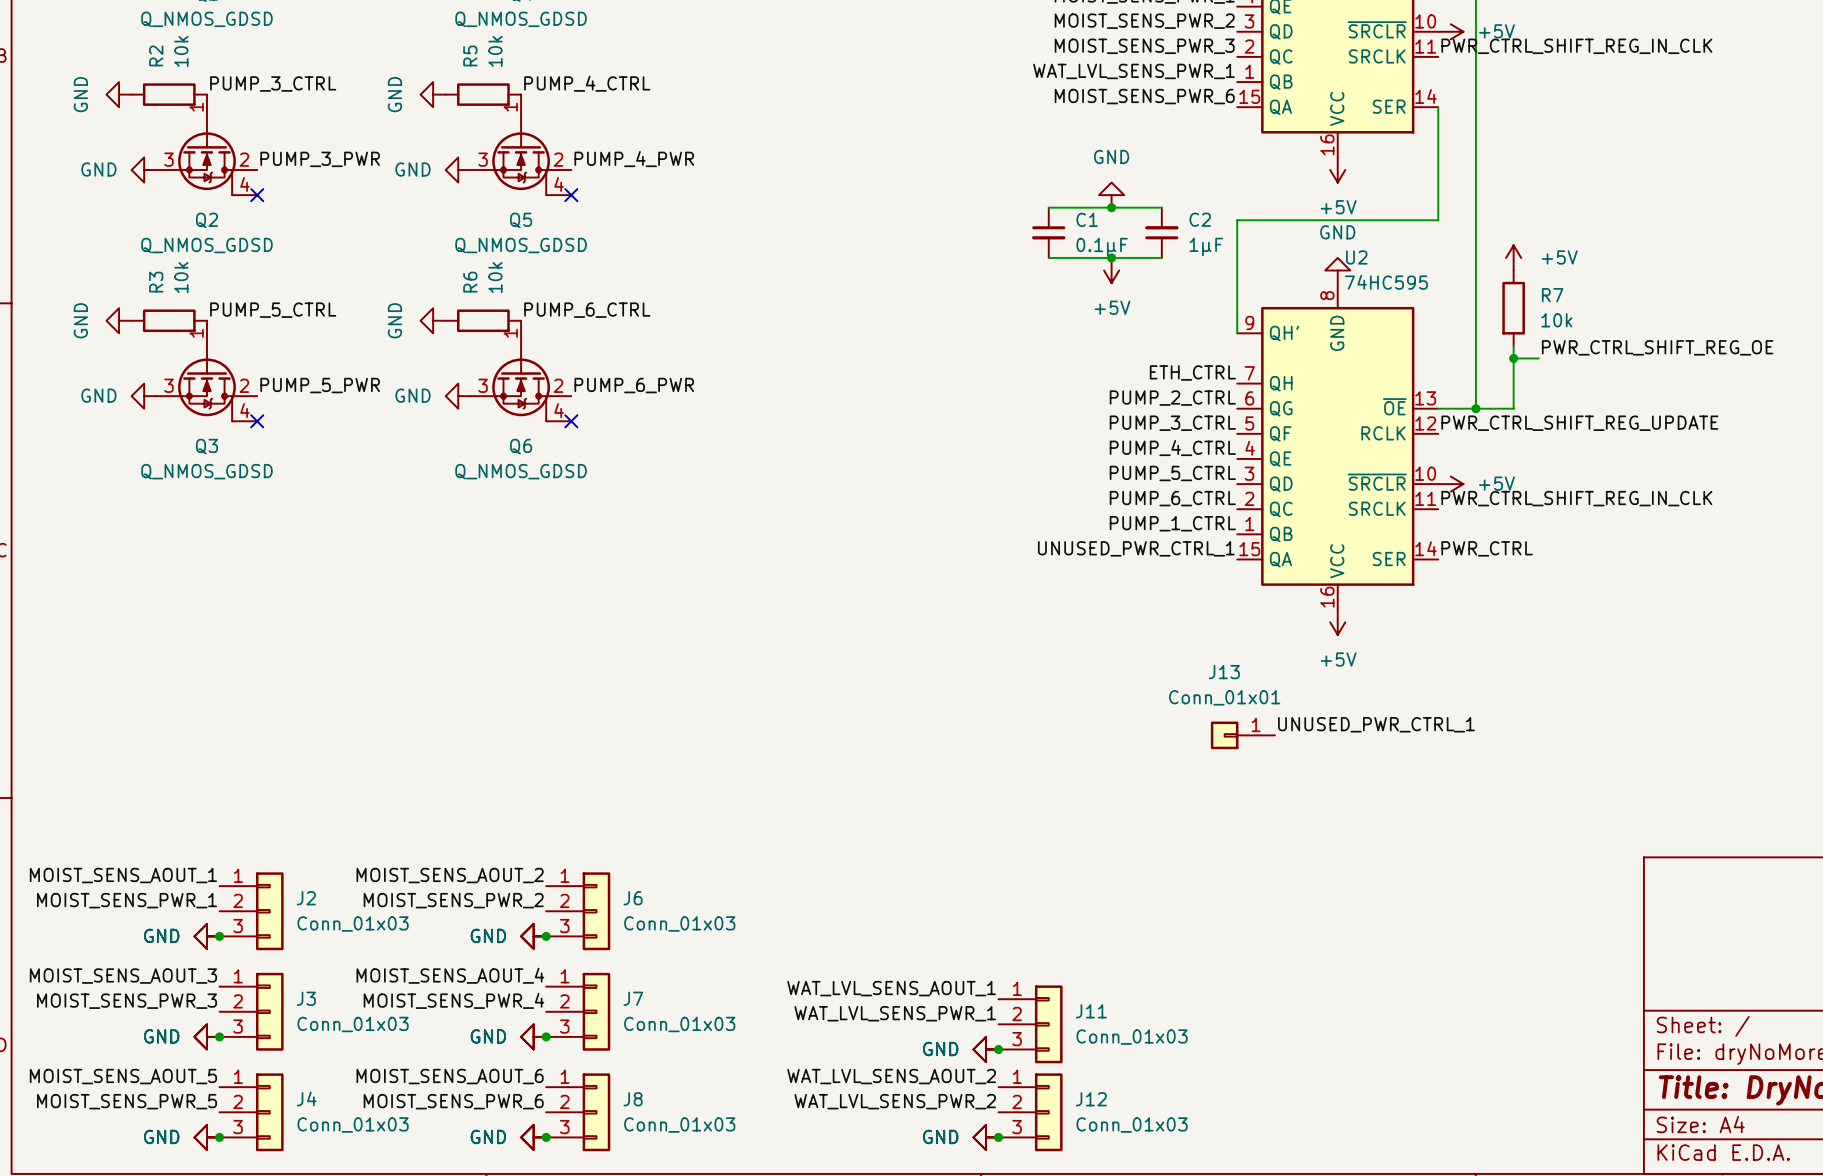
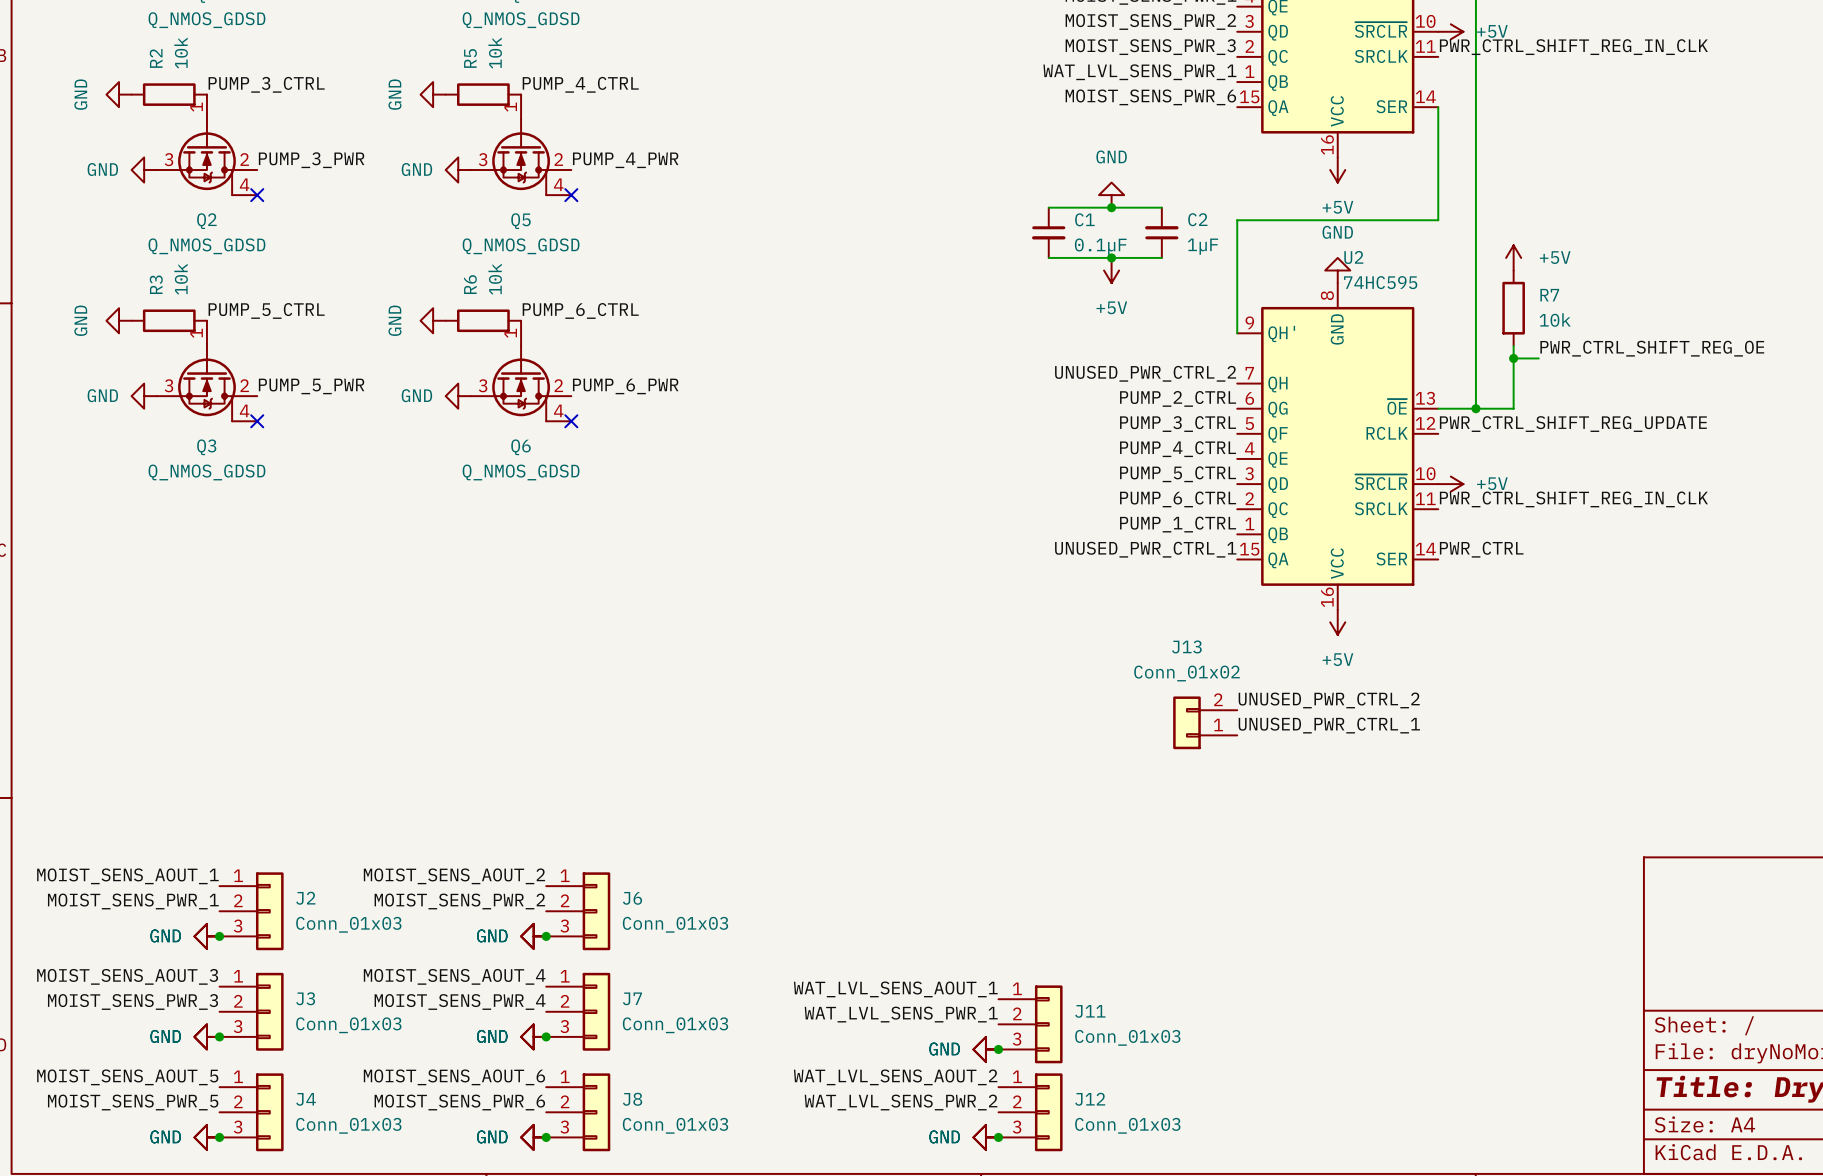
label: ETH_CTRL (1192, 372) -> UNUSED_PWR_CTRL_2 (1145, 373)
J13 value: Conn_01x01 (1224, 697) -> Conn_01x02 (1187, 673)
label: none -> UNUSED_PWR_CTRL_2 (1329, 700)
J13 symbol: [1210, 721, 1275, 750] -> [1173, 696, 1238, 750]
label position: UNUSED_PWR_CTRL_1 (1376, 724) -> UNUSED_PWR_CTRL_1 (1329, 725)

